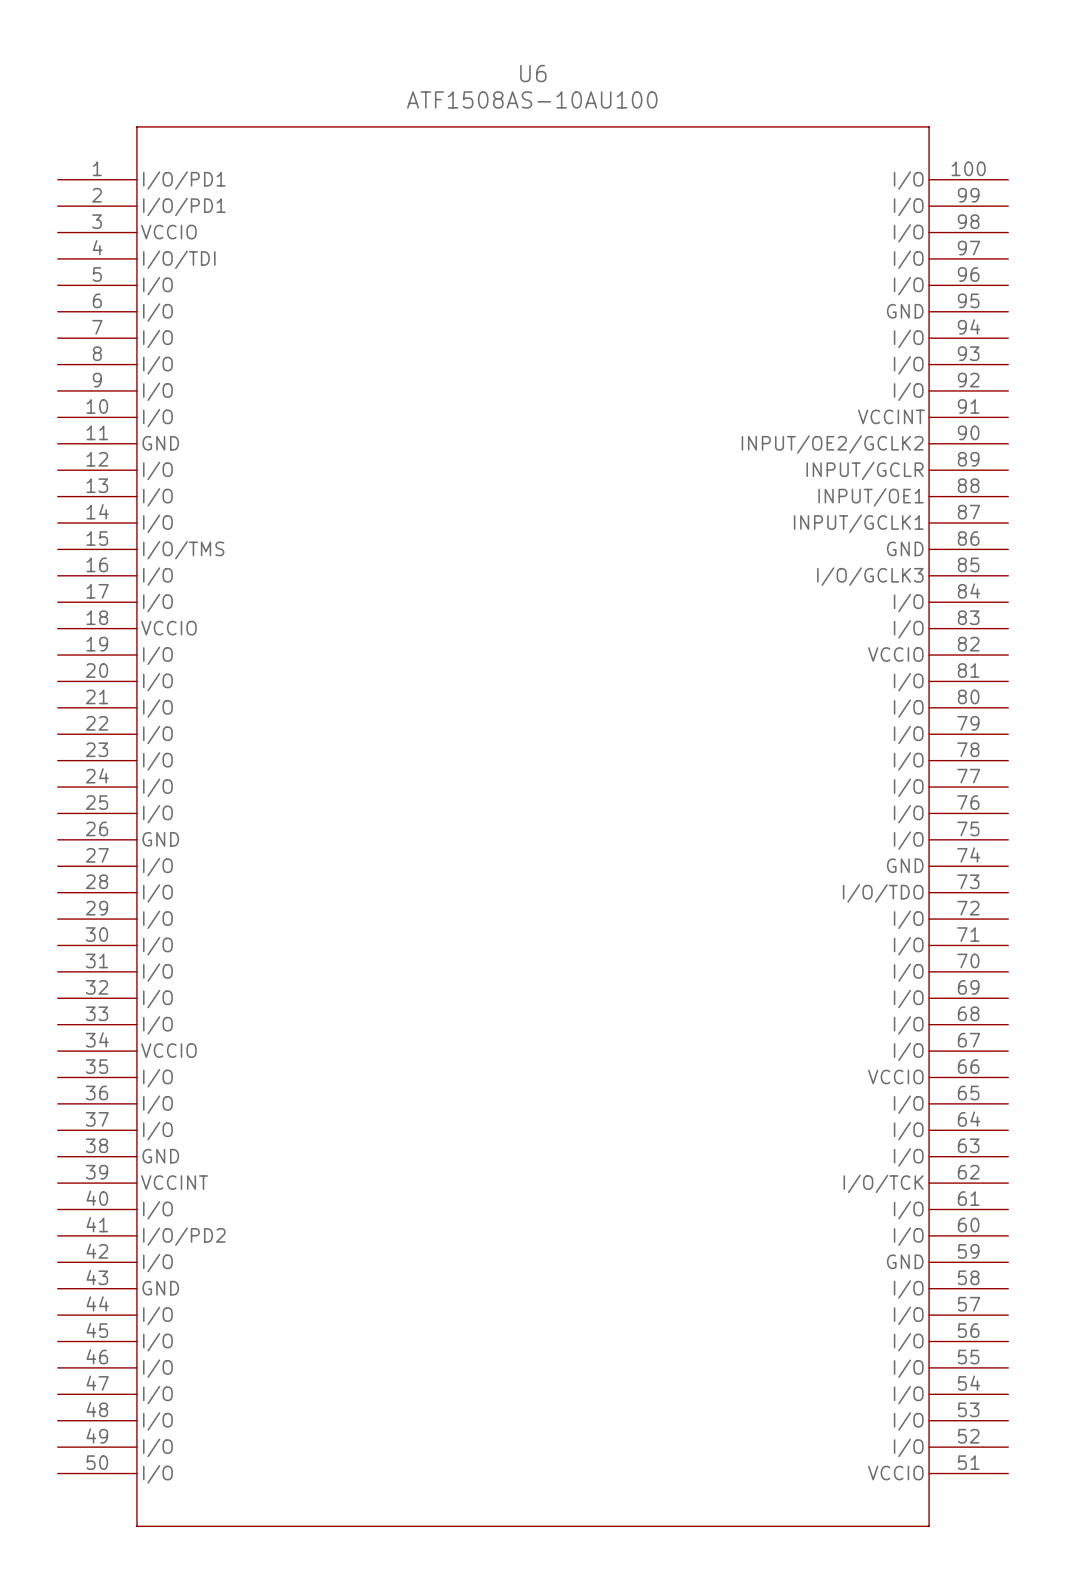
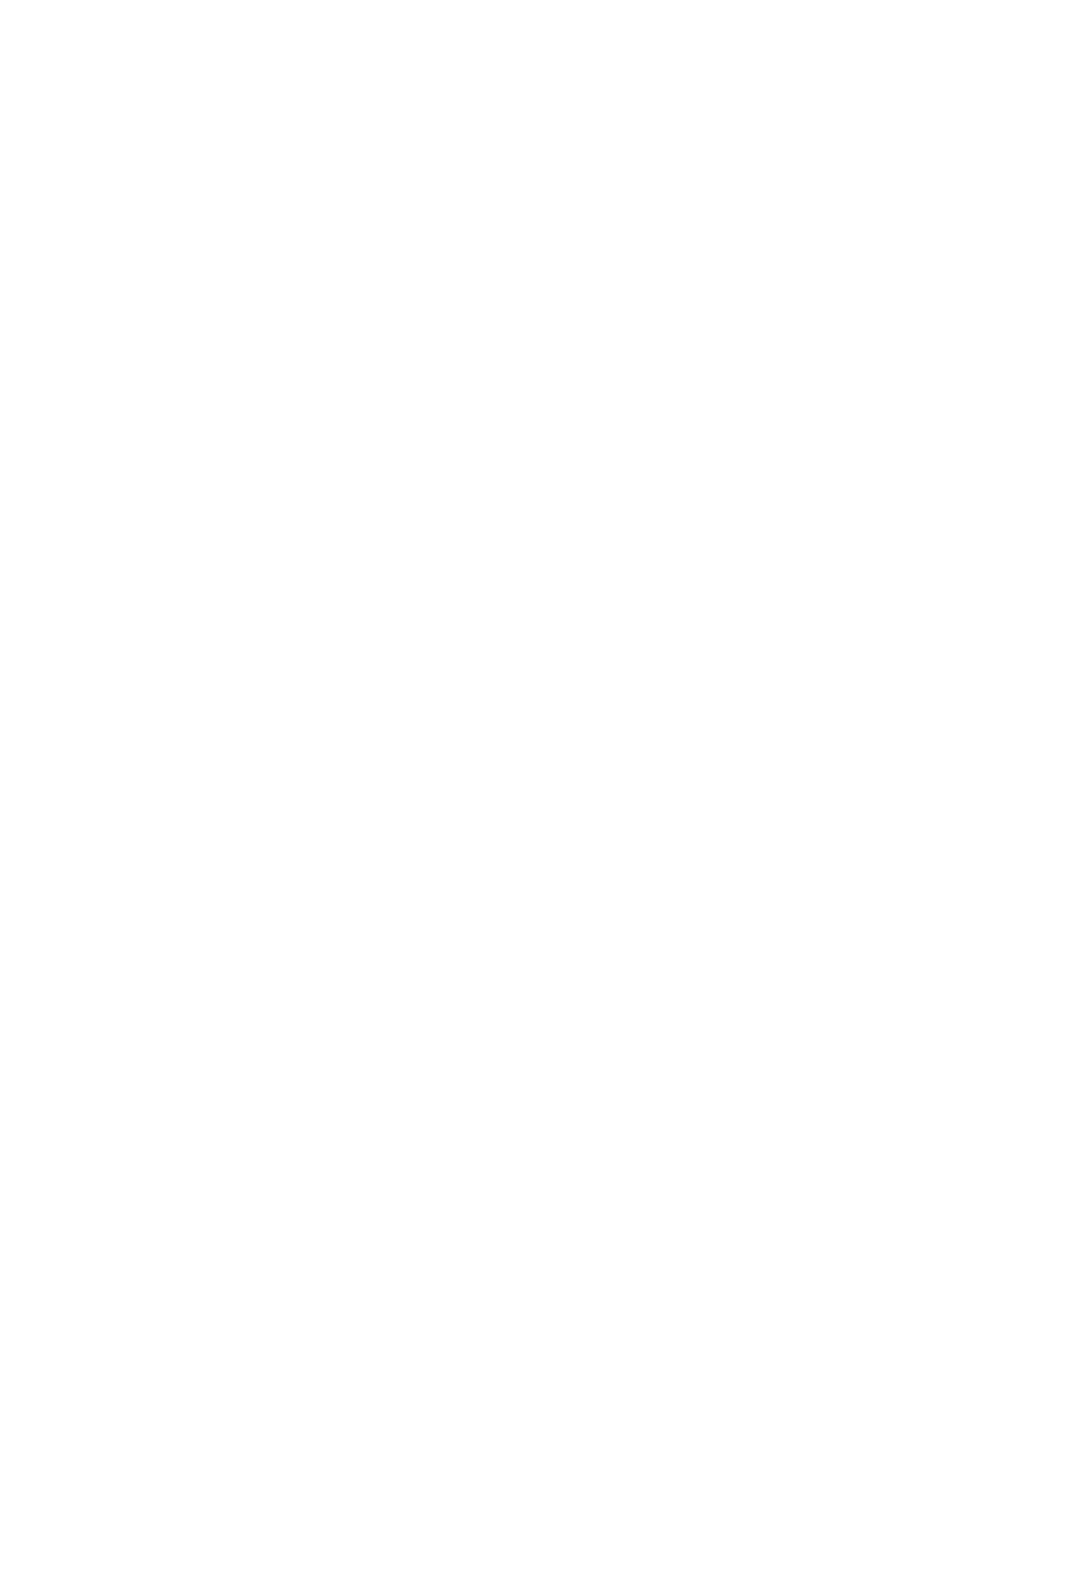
U6: ATF1508AS-10AU100 (533, 826) -> none

